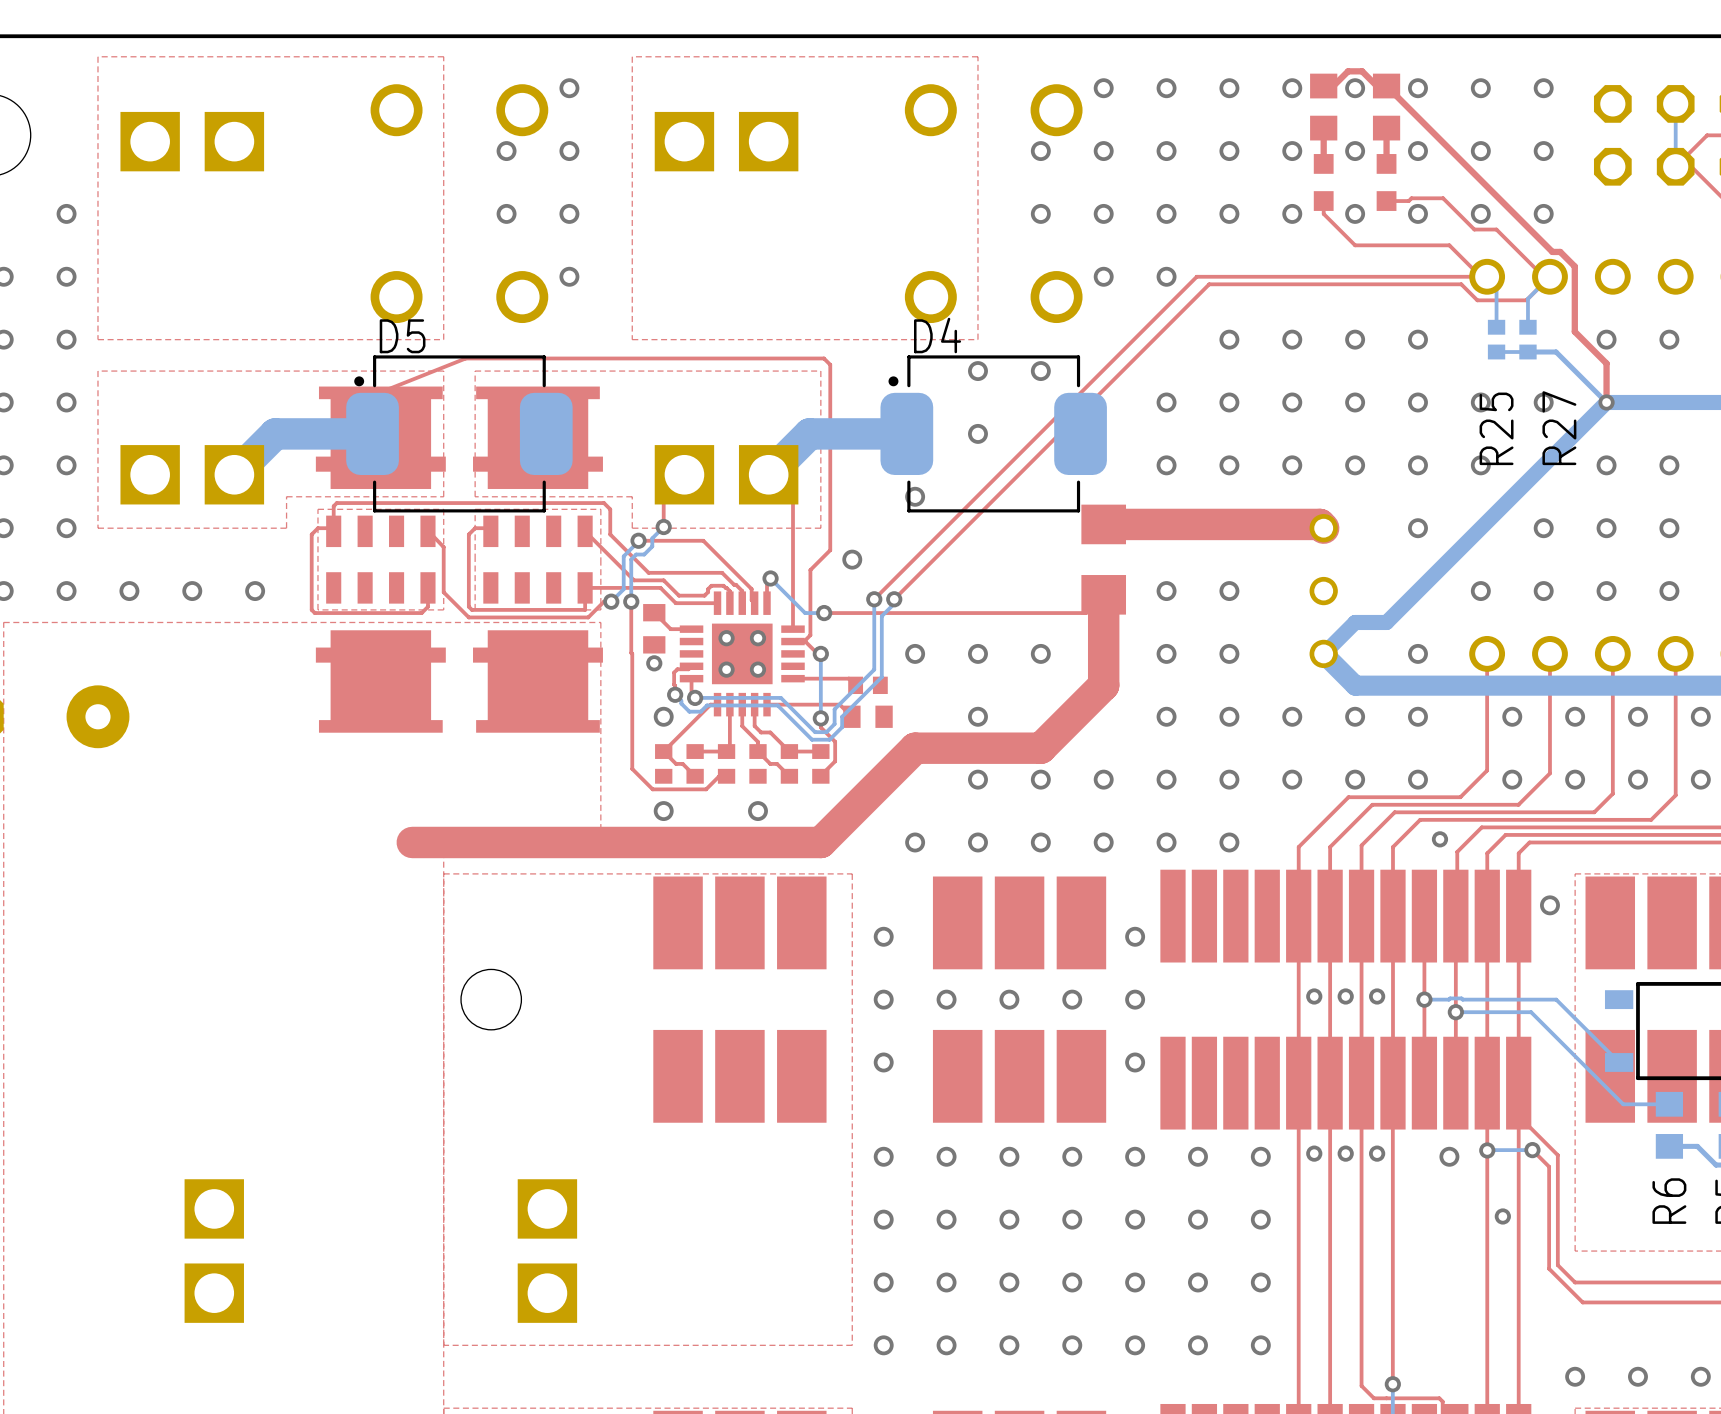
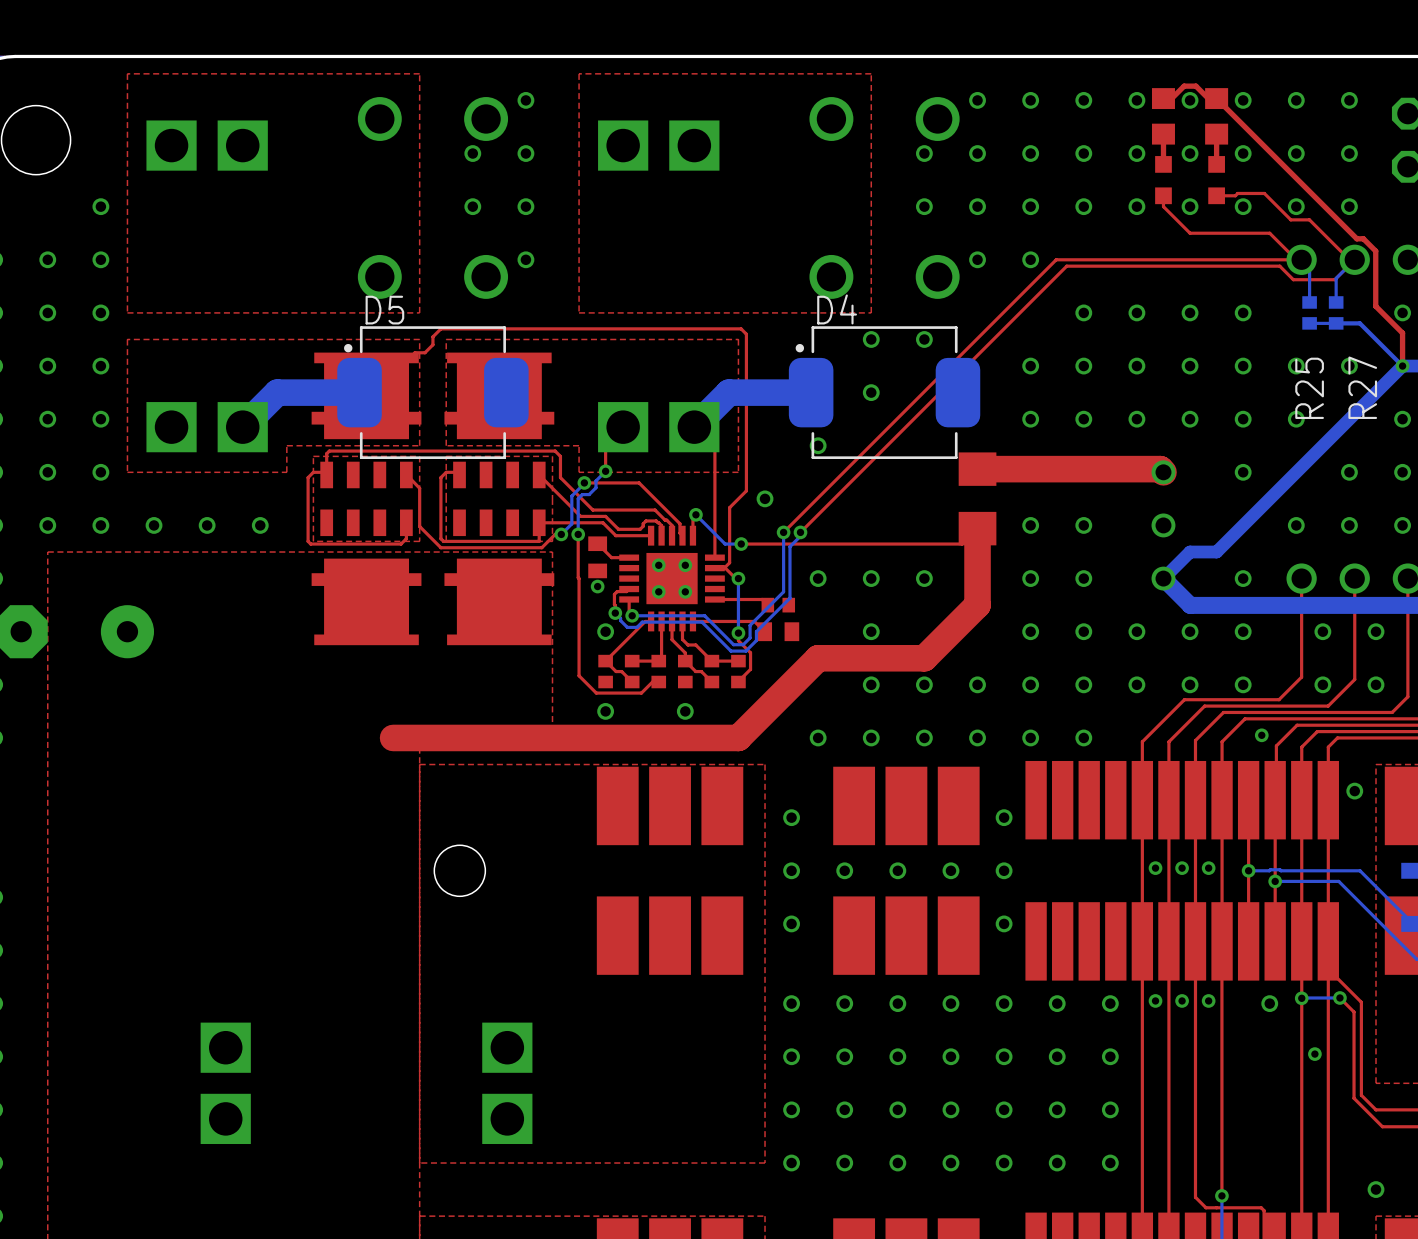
top track: (468, 358) (380, 392) -> (440, 328) (432, 336) (432, 344) (424, 352) (414, 352) (366, 401)

